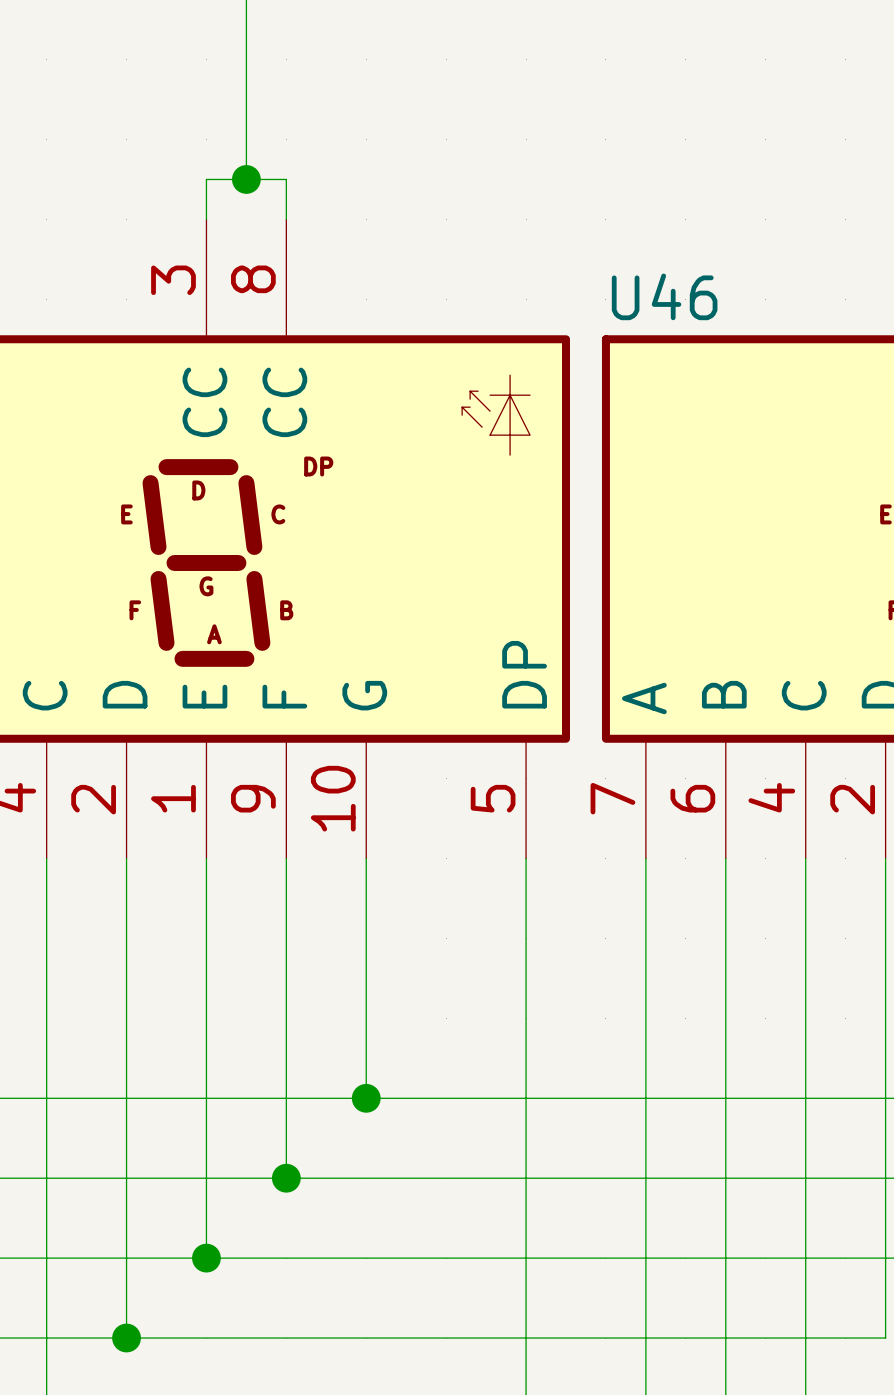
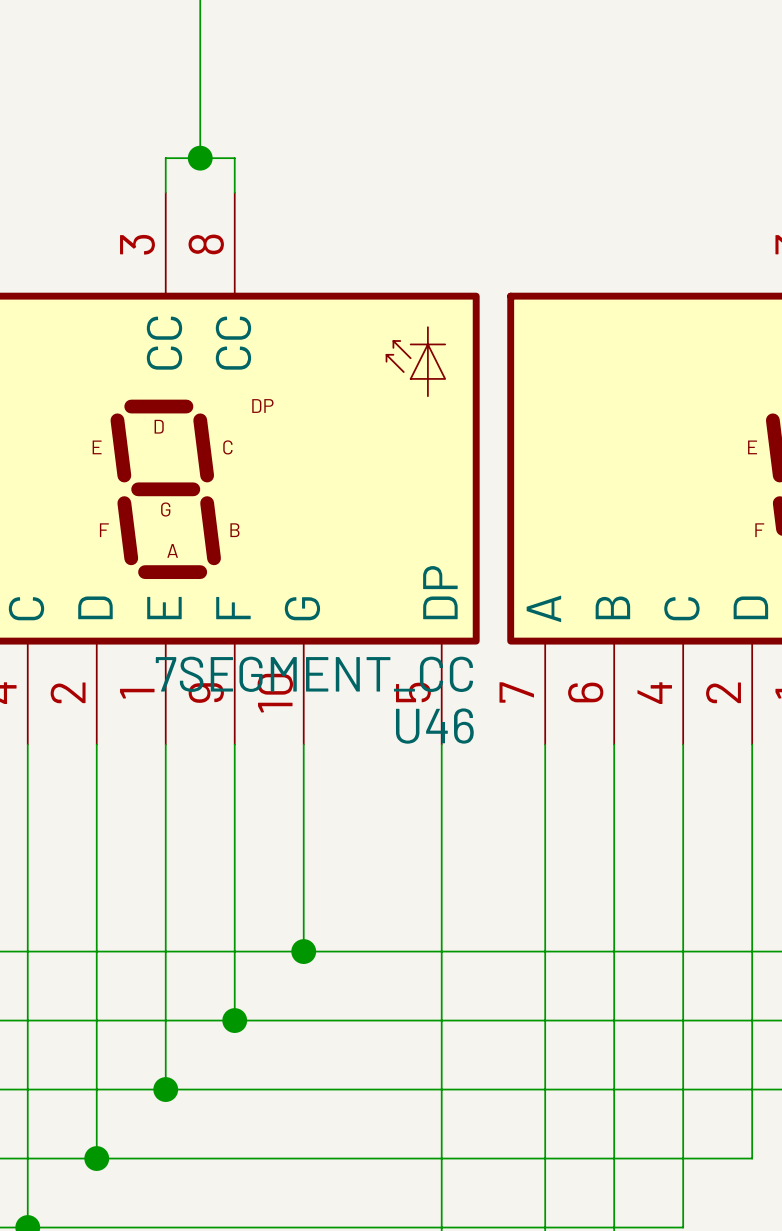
U46 name position: U46 (664, 296) -> U46 (434, 726)
U46 value: none -> 7SEGMENT_CC (314, 674)

